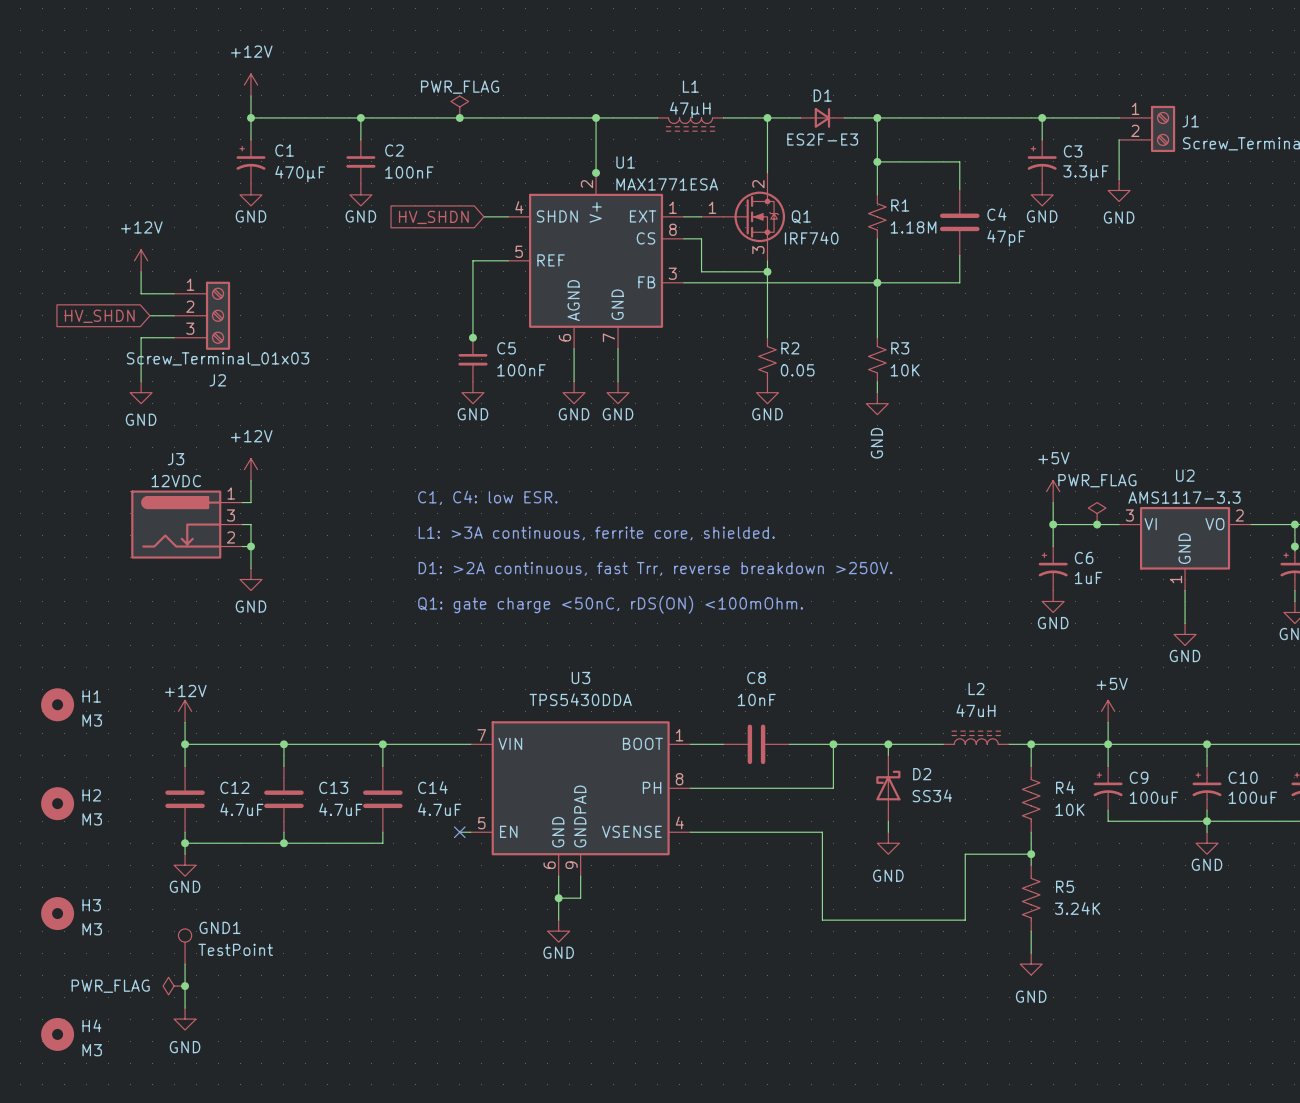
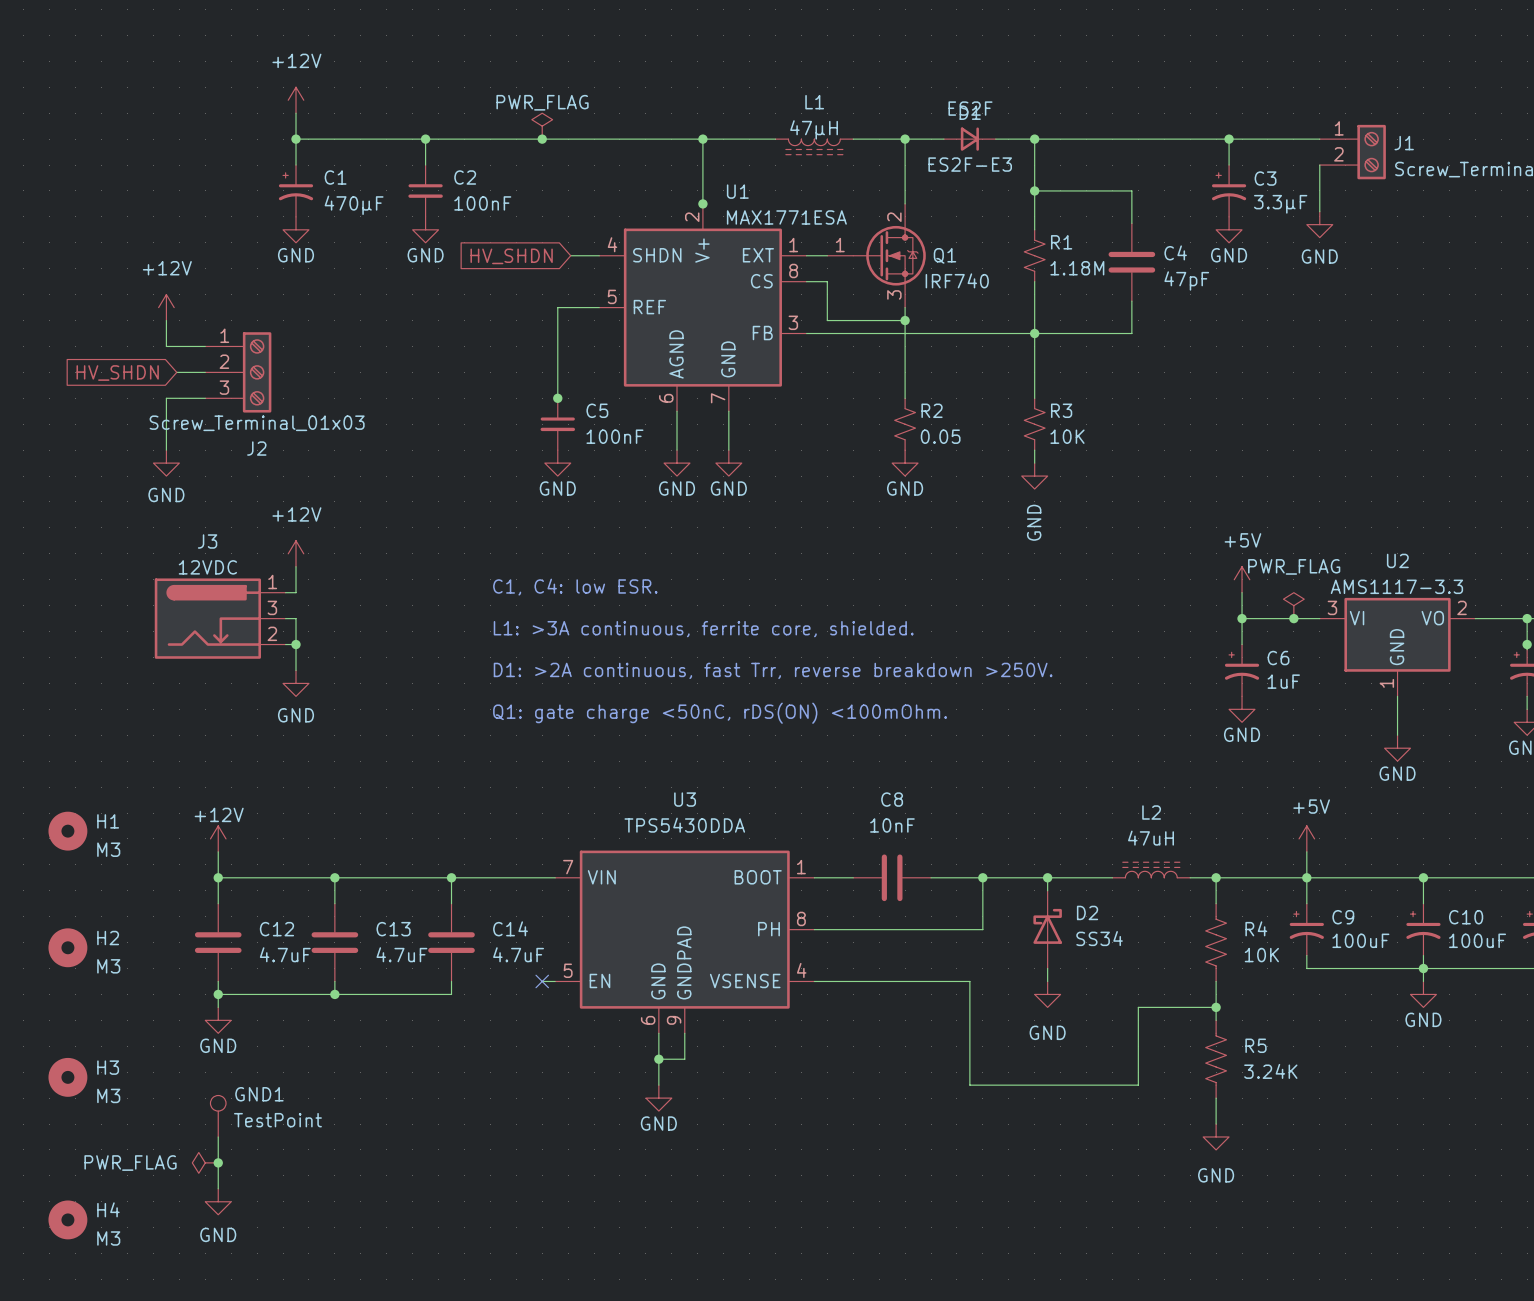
D1 value: none -> ES2F (970, 108)

